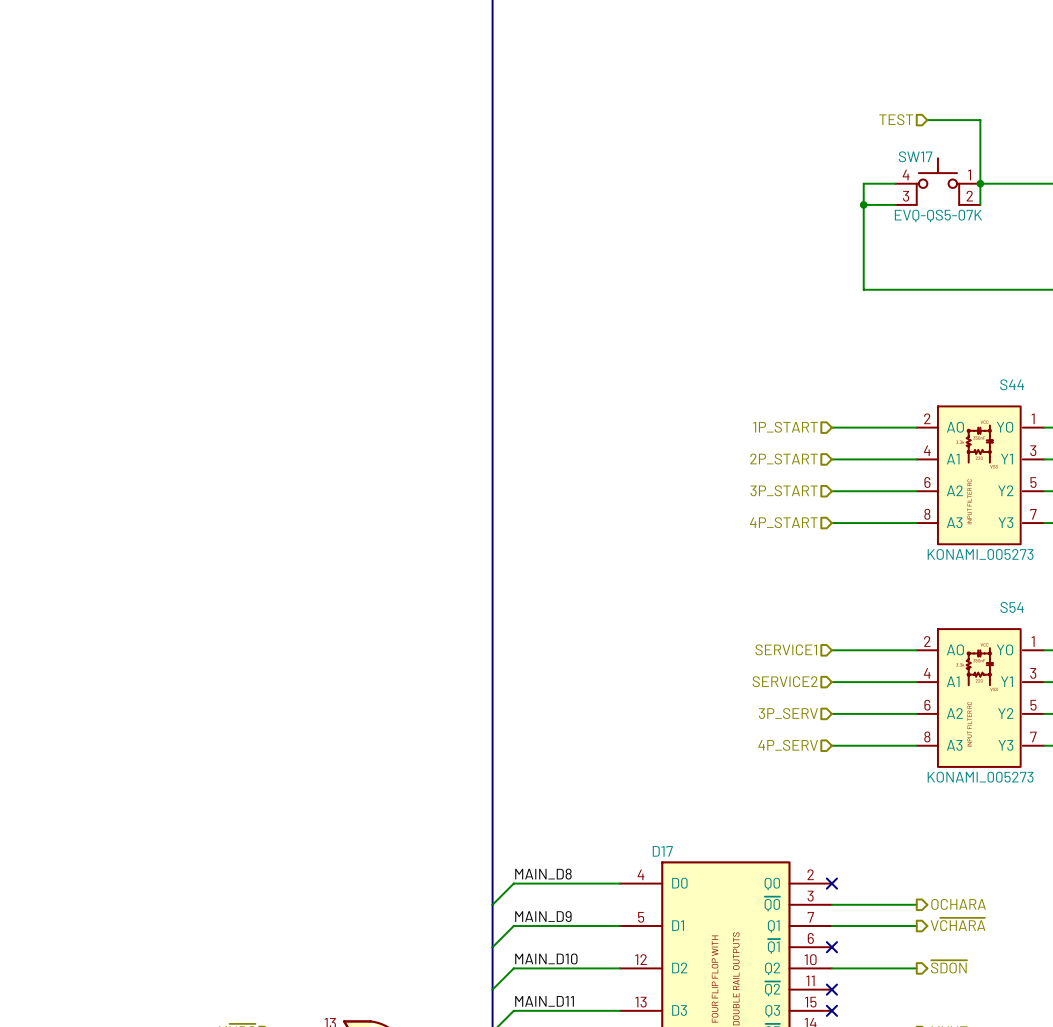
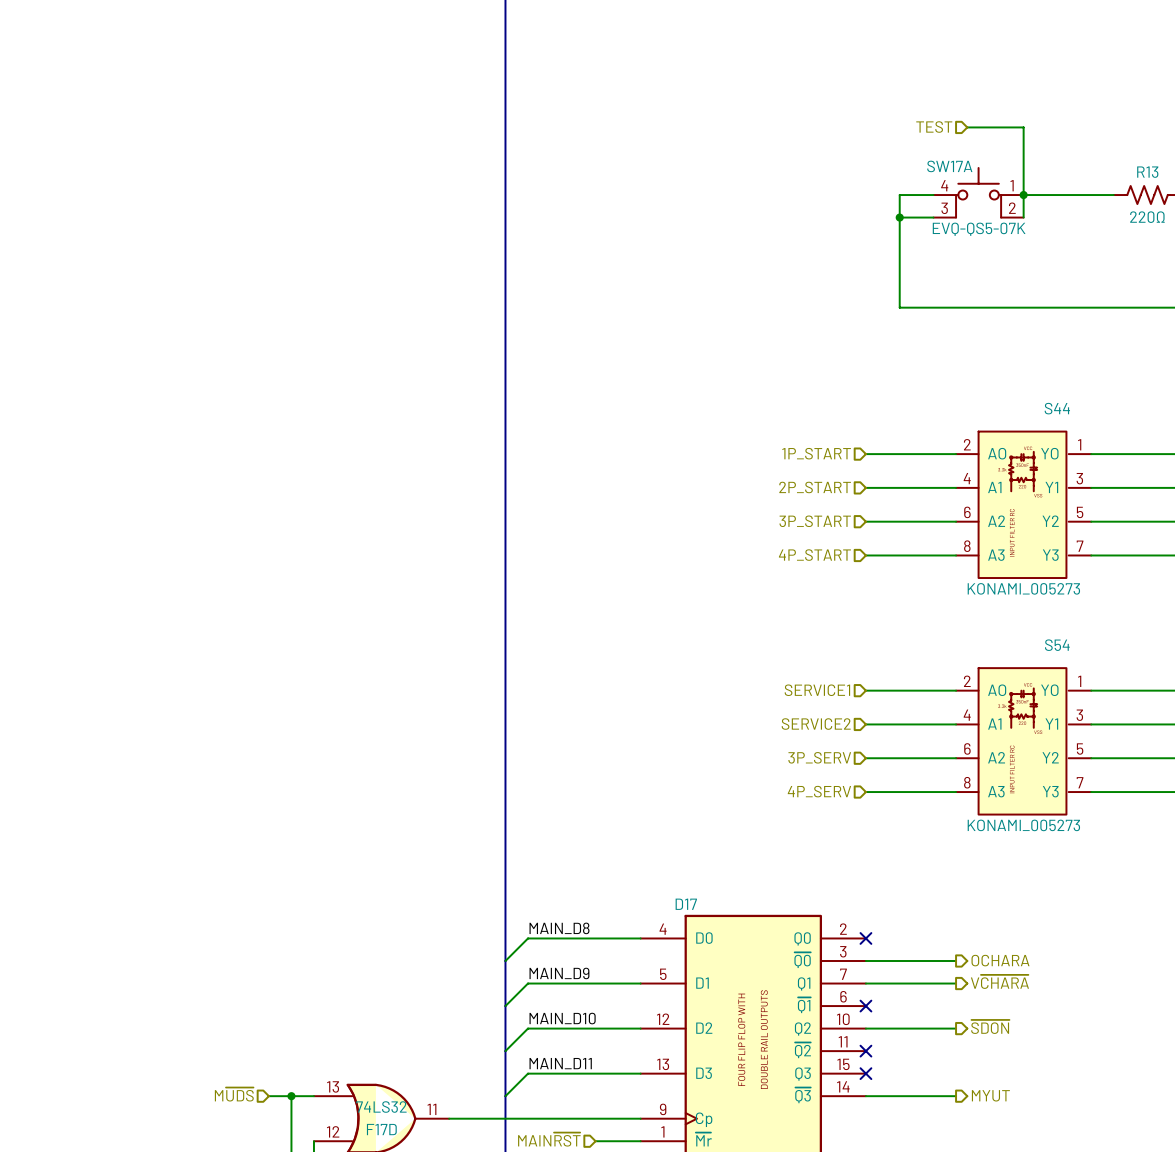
SW17 name: SW17 (915, 156) -> SW17A (949, 166)

